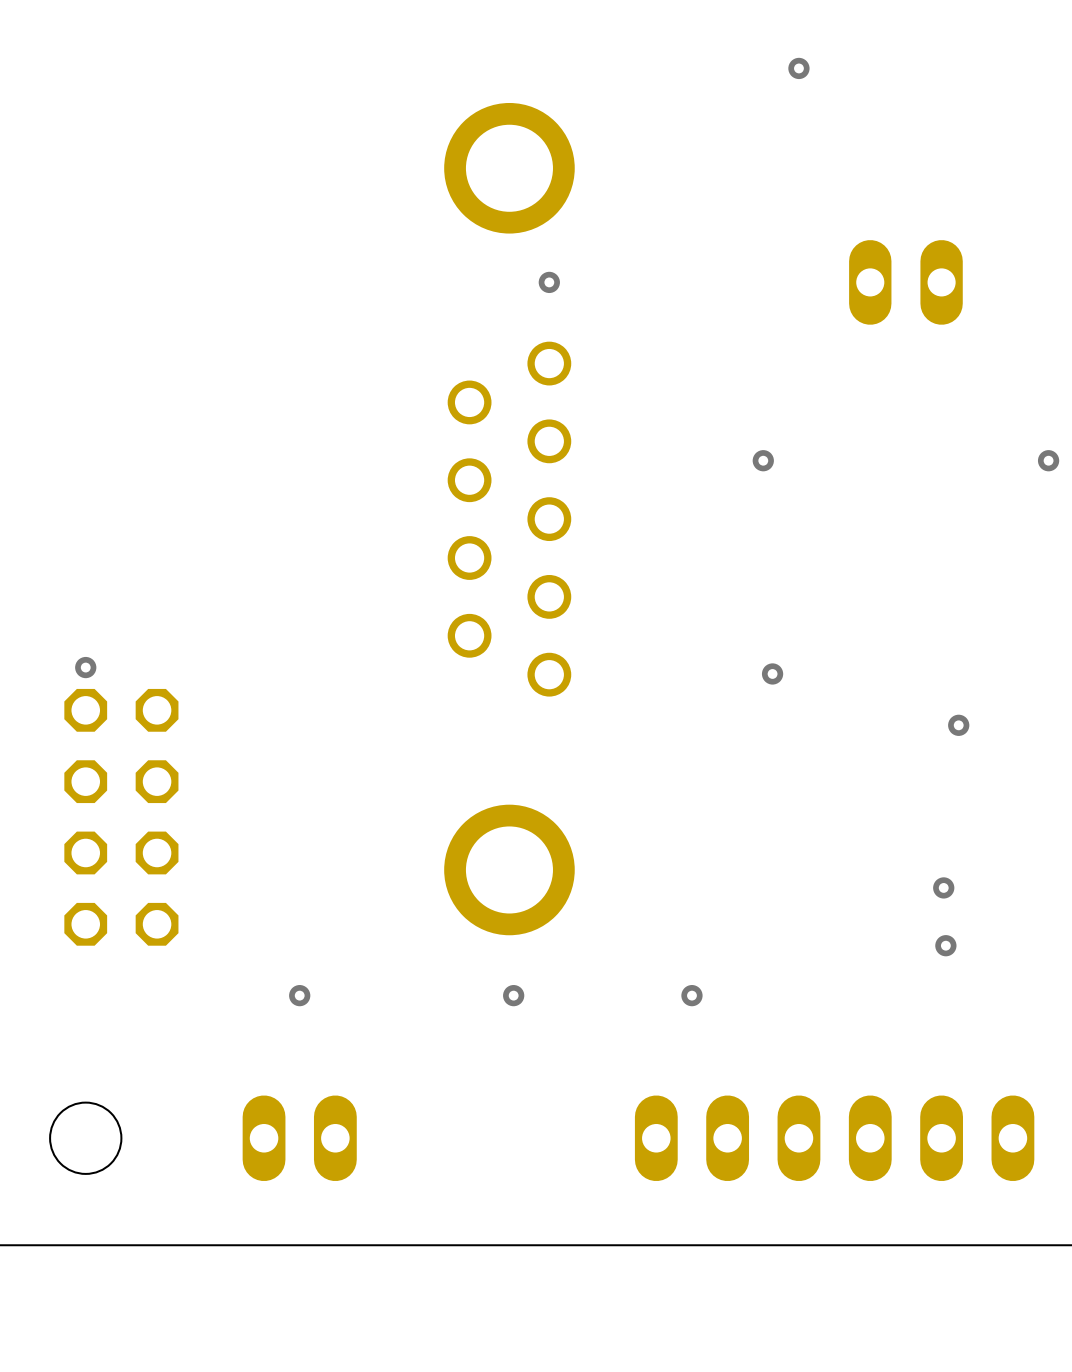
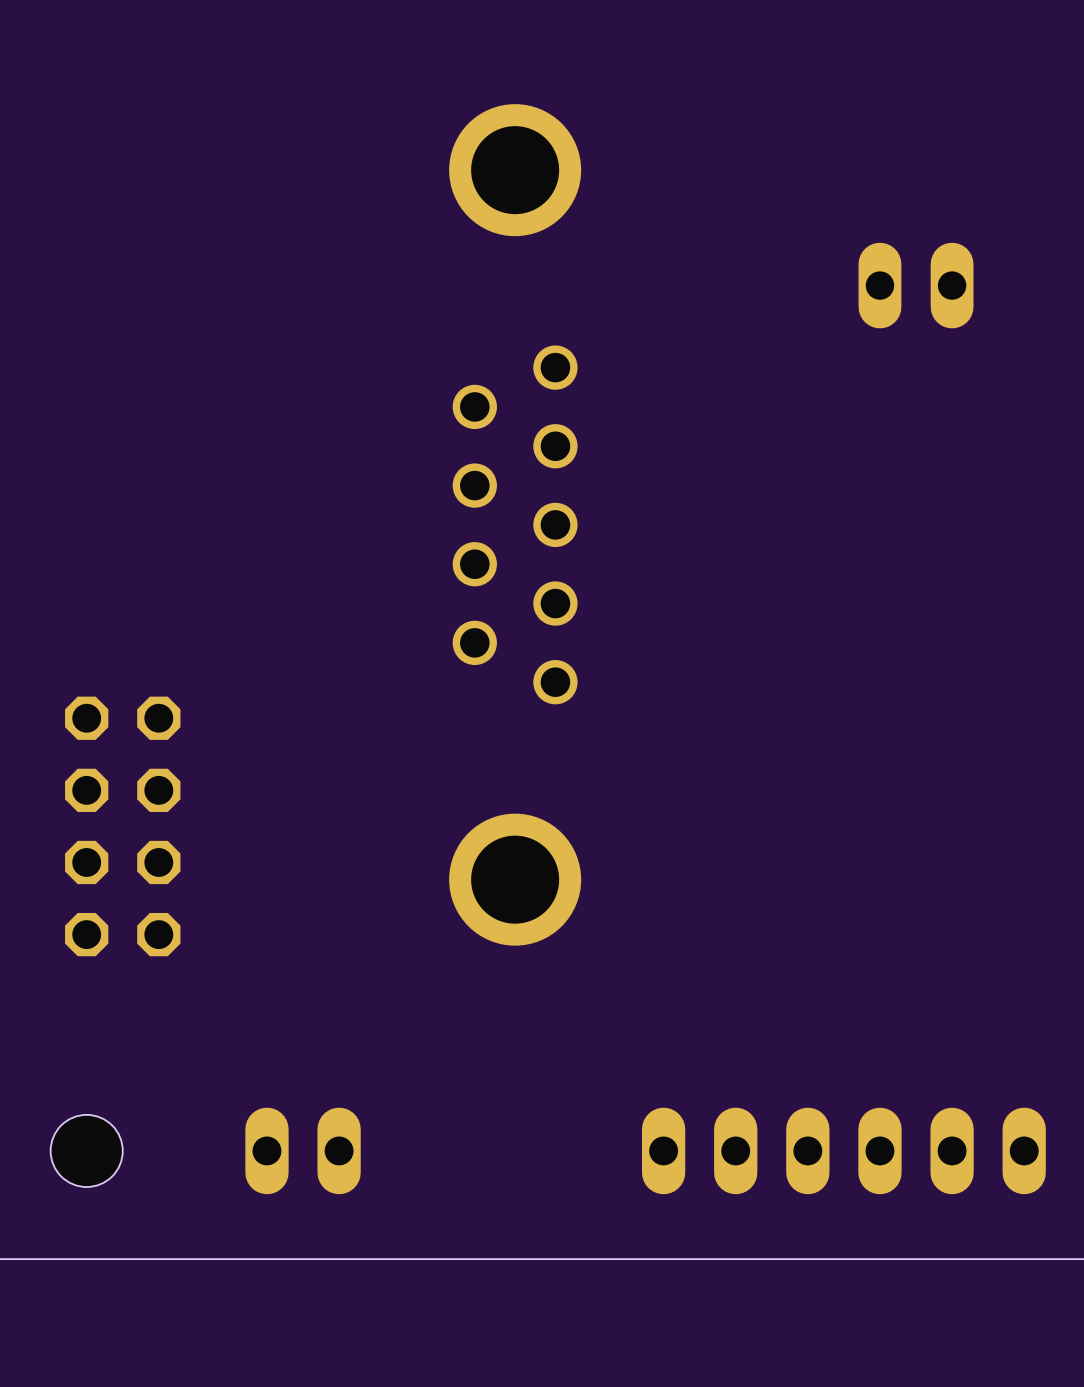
via: (798, 68) -> none
via: (549, 282) -> none
via: (763, 460) -> none
via: (1048, 460) -> none
via: (85, 667) -> none
via: (772, 673) -> none
via: (958, 725) -> none
via: (943, 887) -> none
via: (945, 945) -> none
via: (299, 995) -> none
via: (513, 995) -> none
via: (691, 995) -> none

